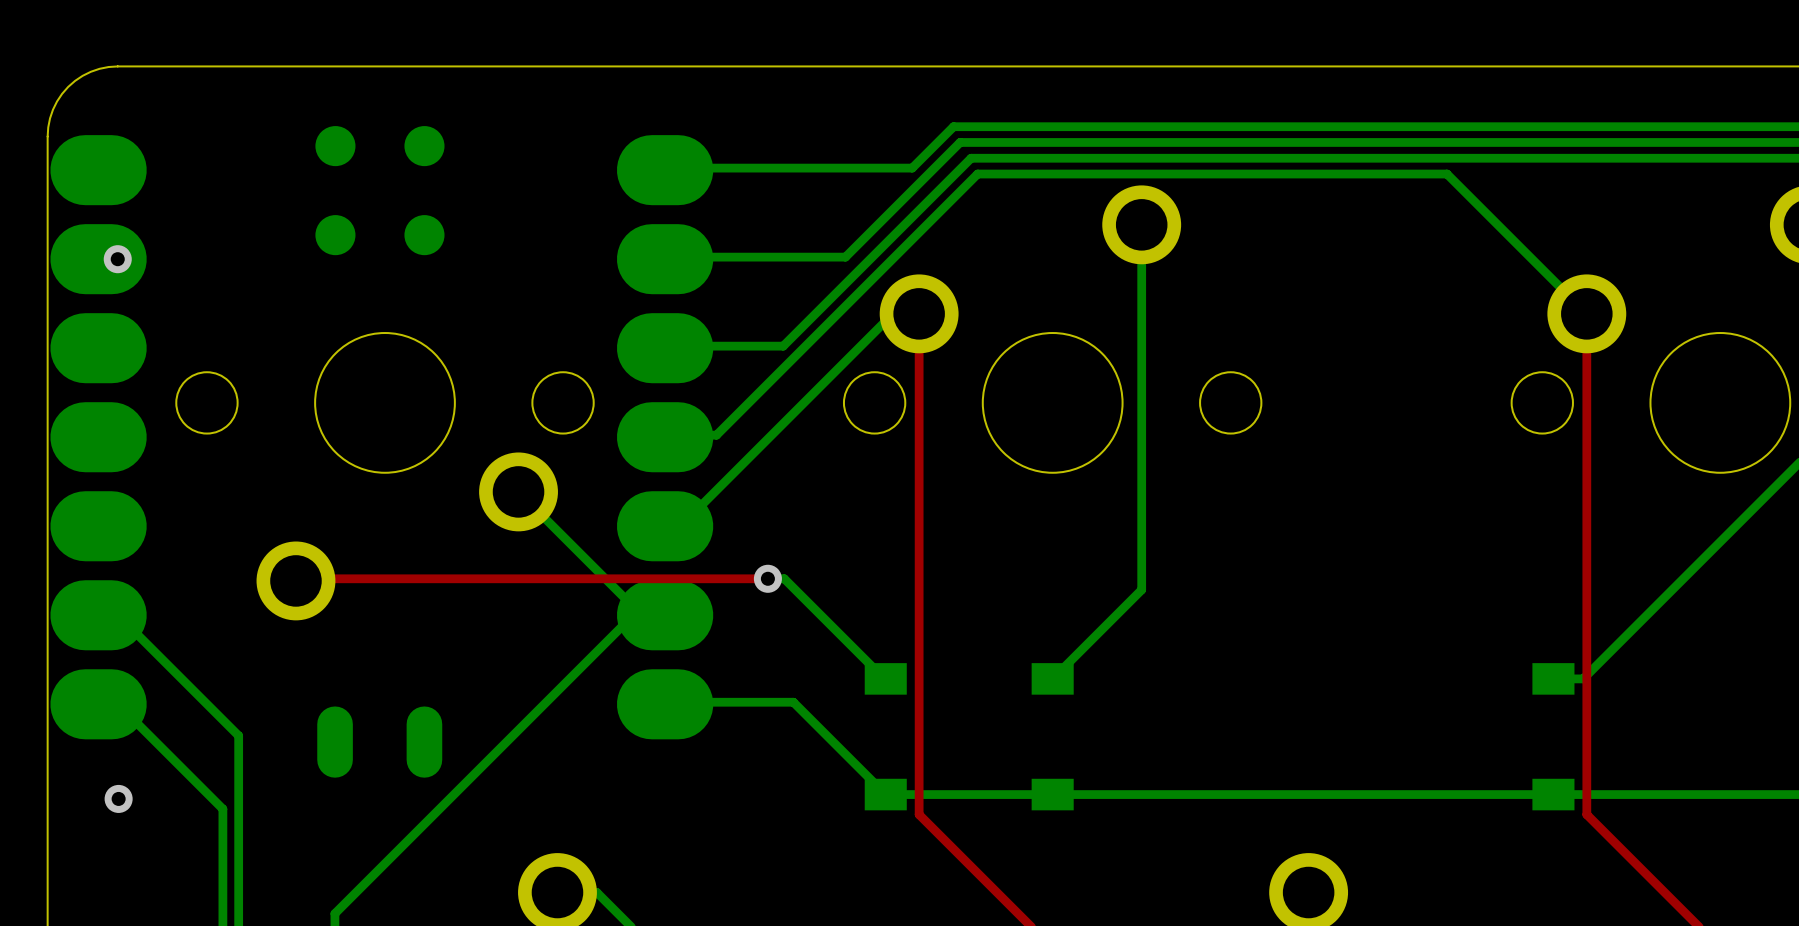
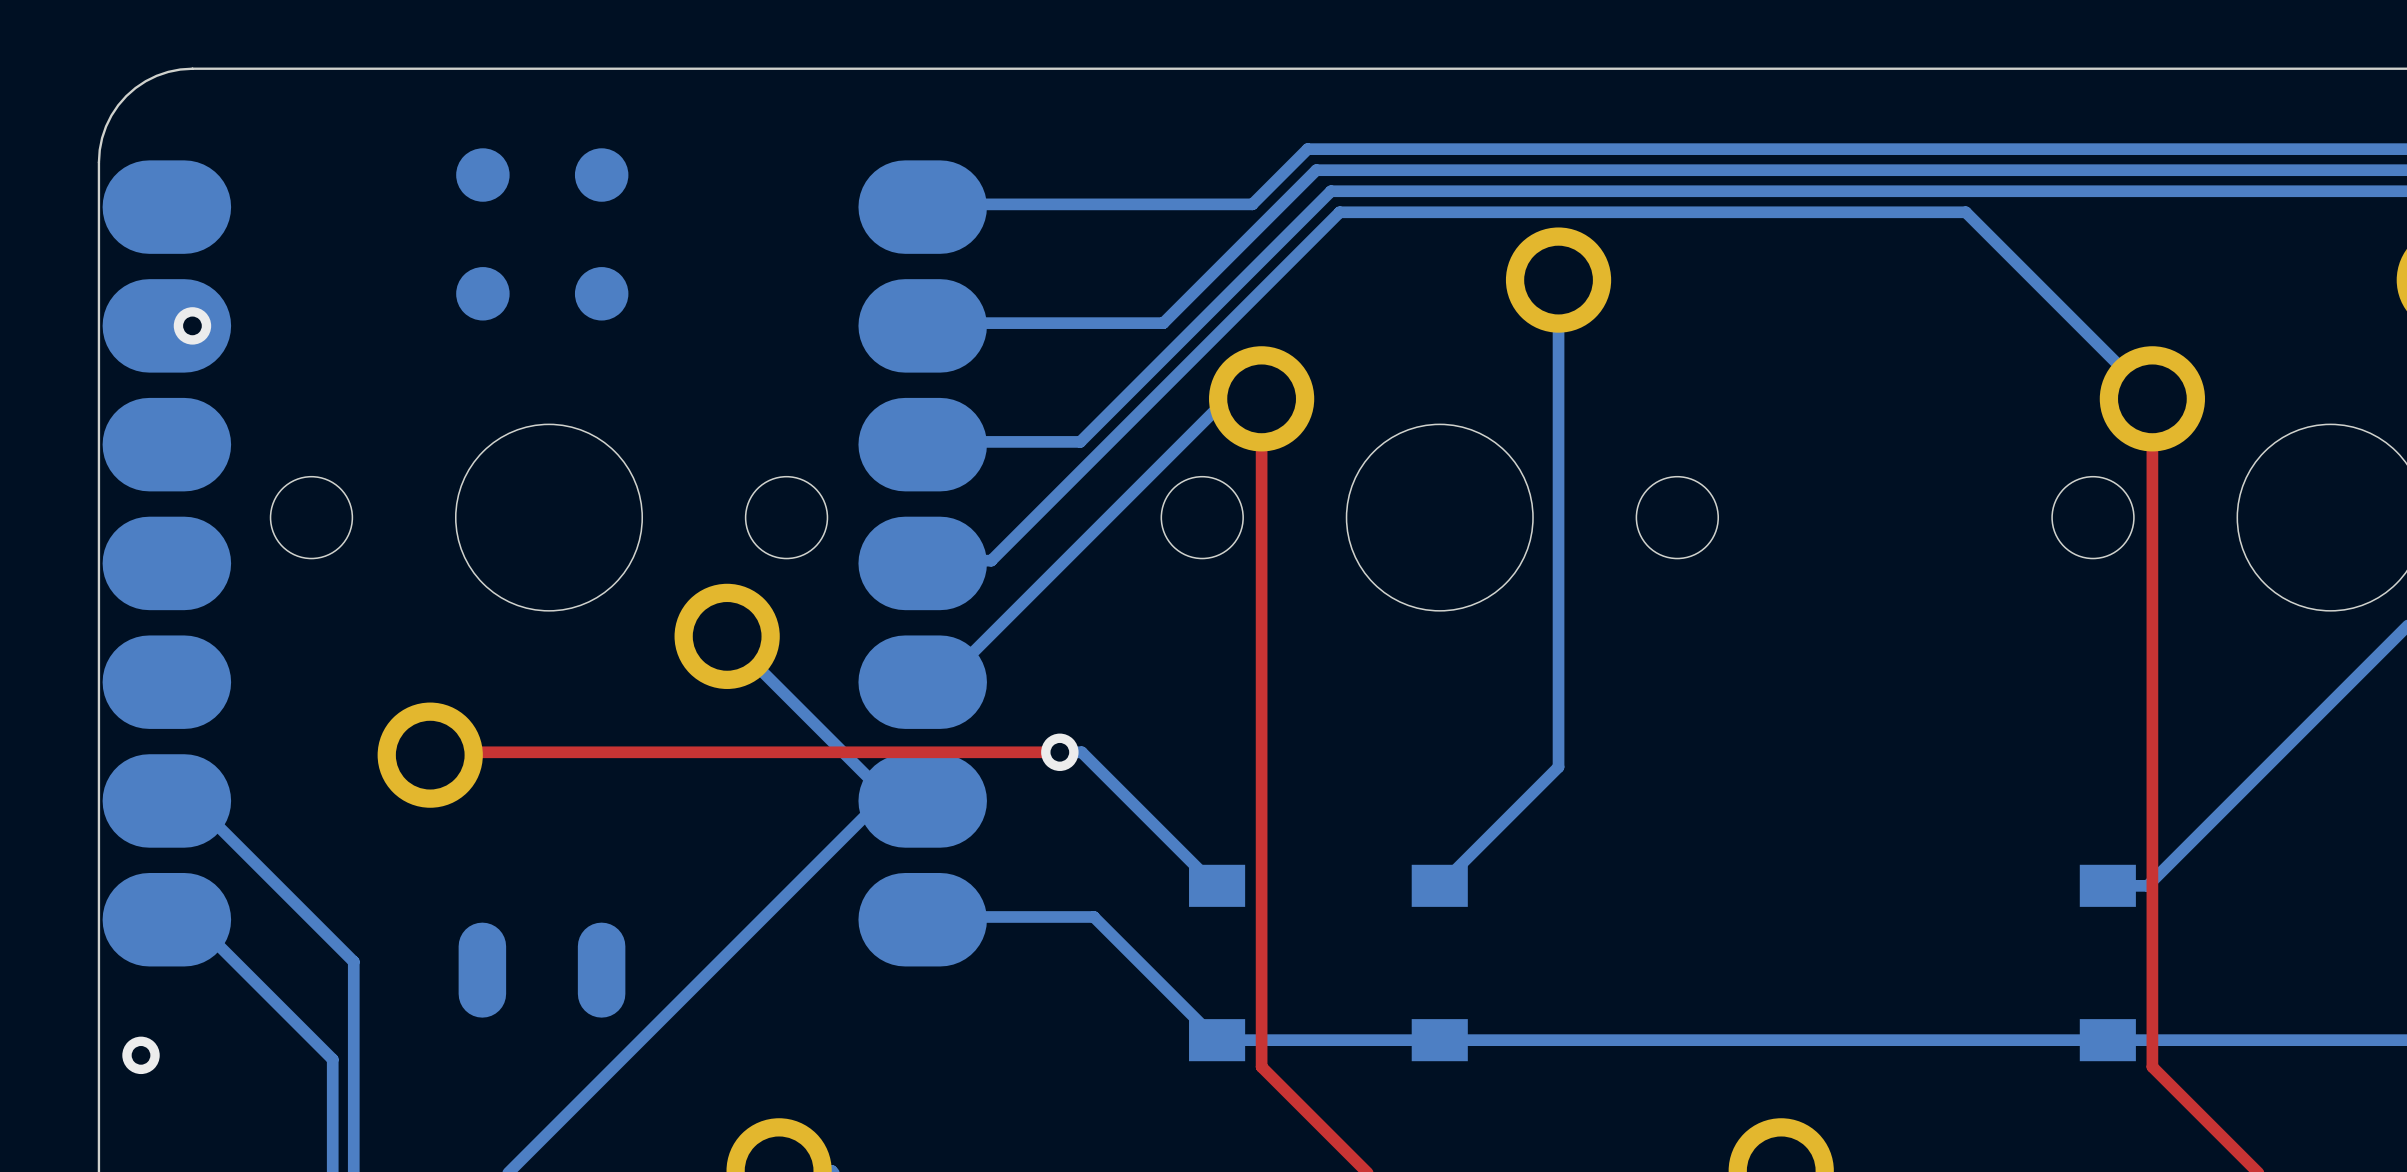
via position: (118, 798) -> (141, 1055)

